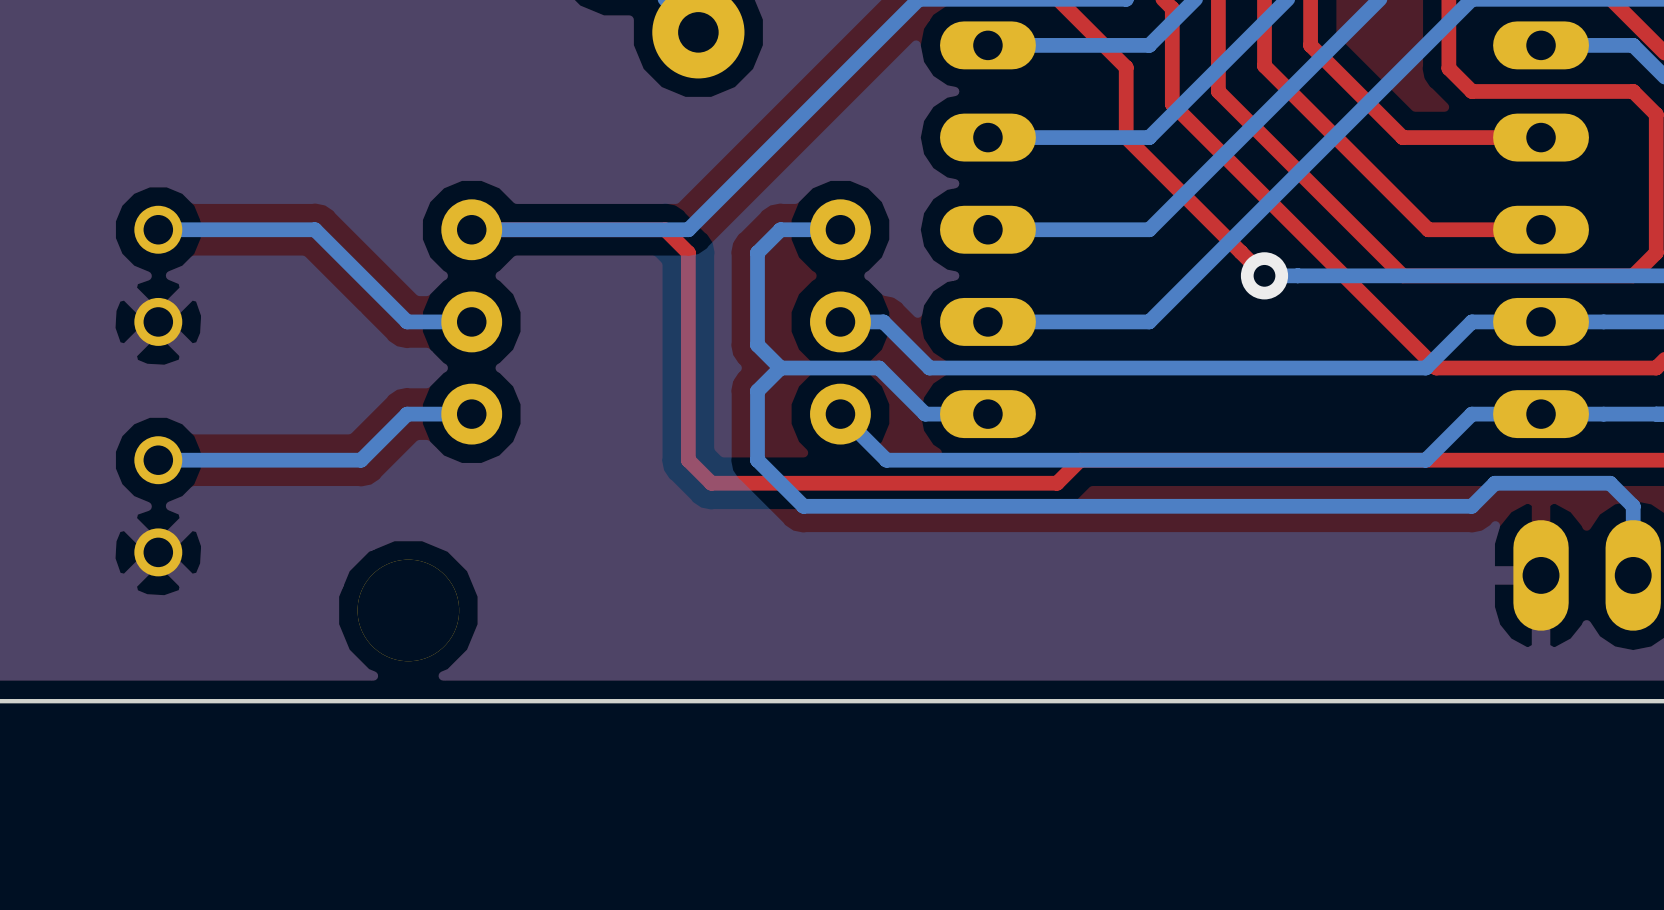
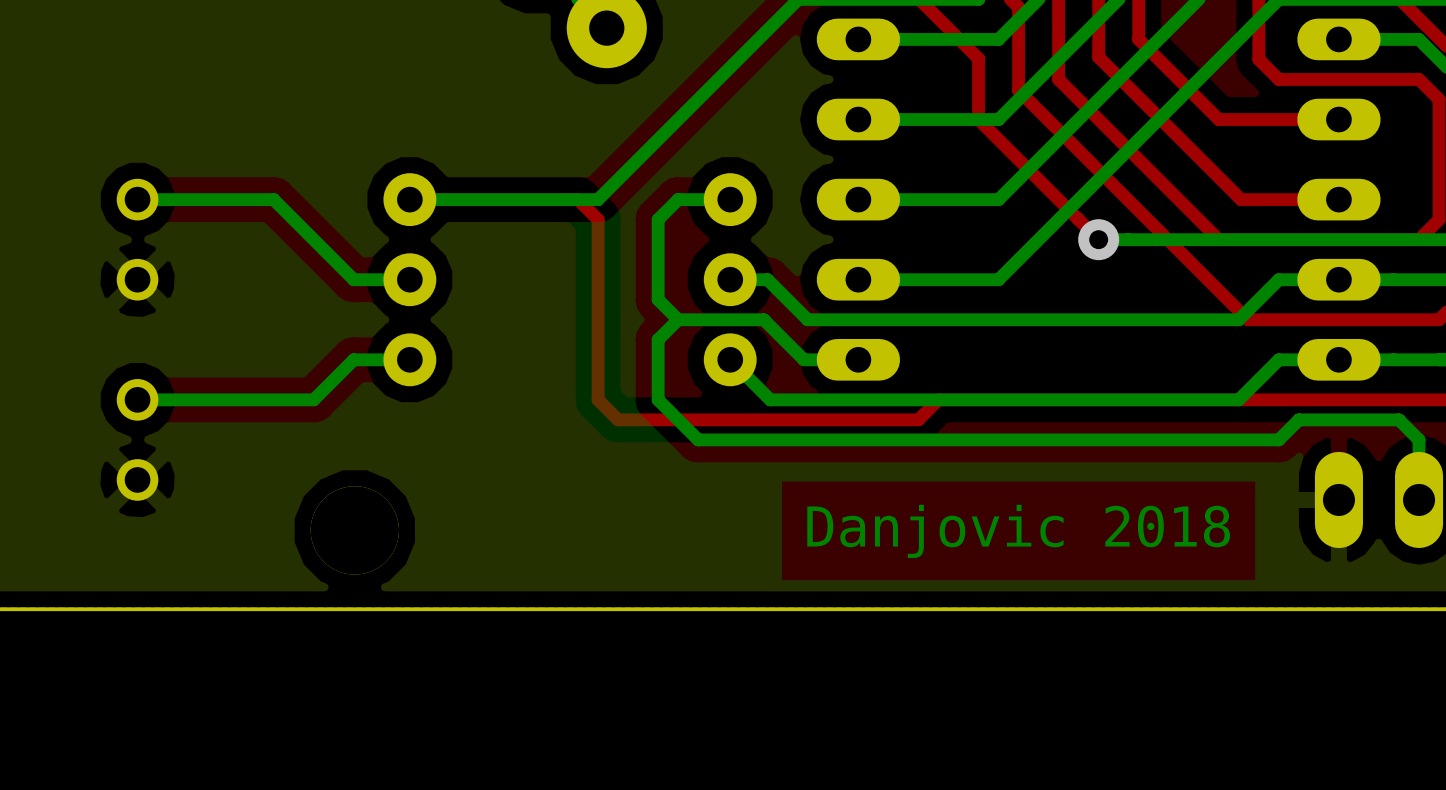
text: none -> Danjovic 2018 (1018, 531)

